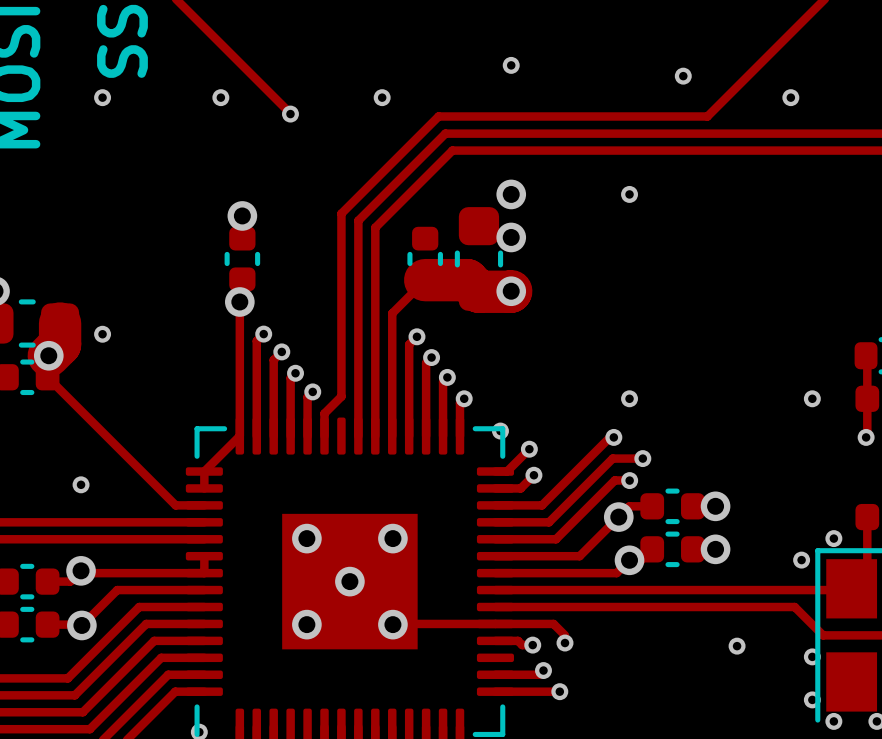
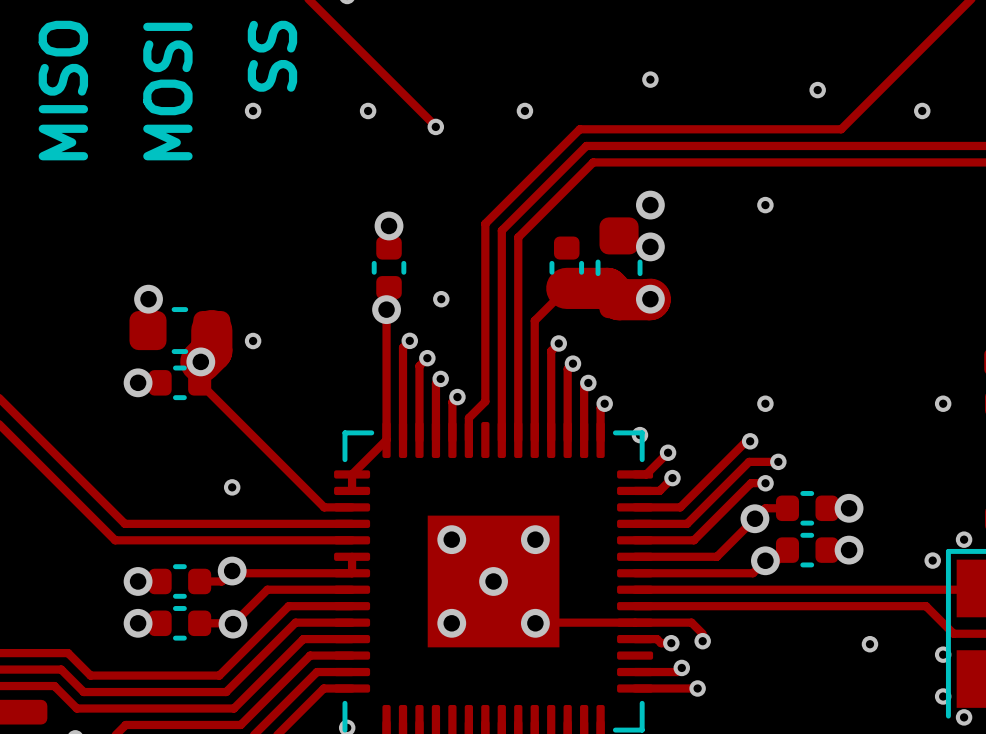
via: none -> (441, 299)

